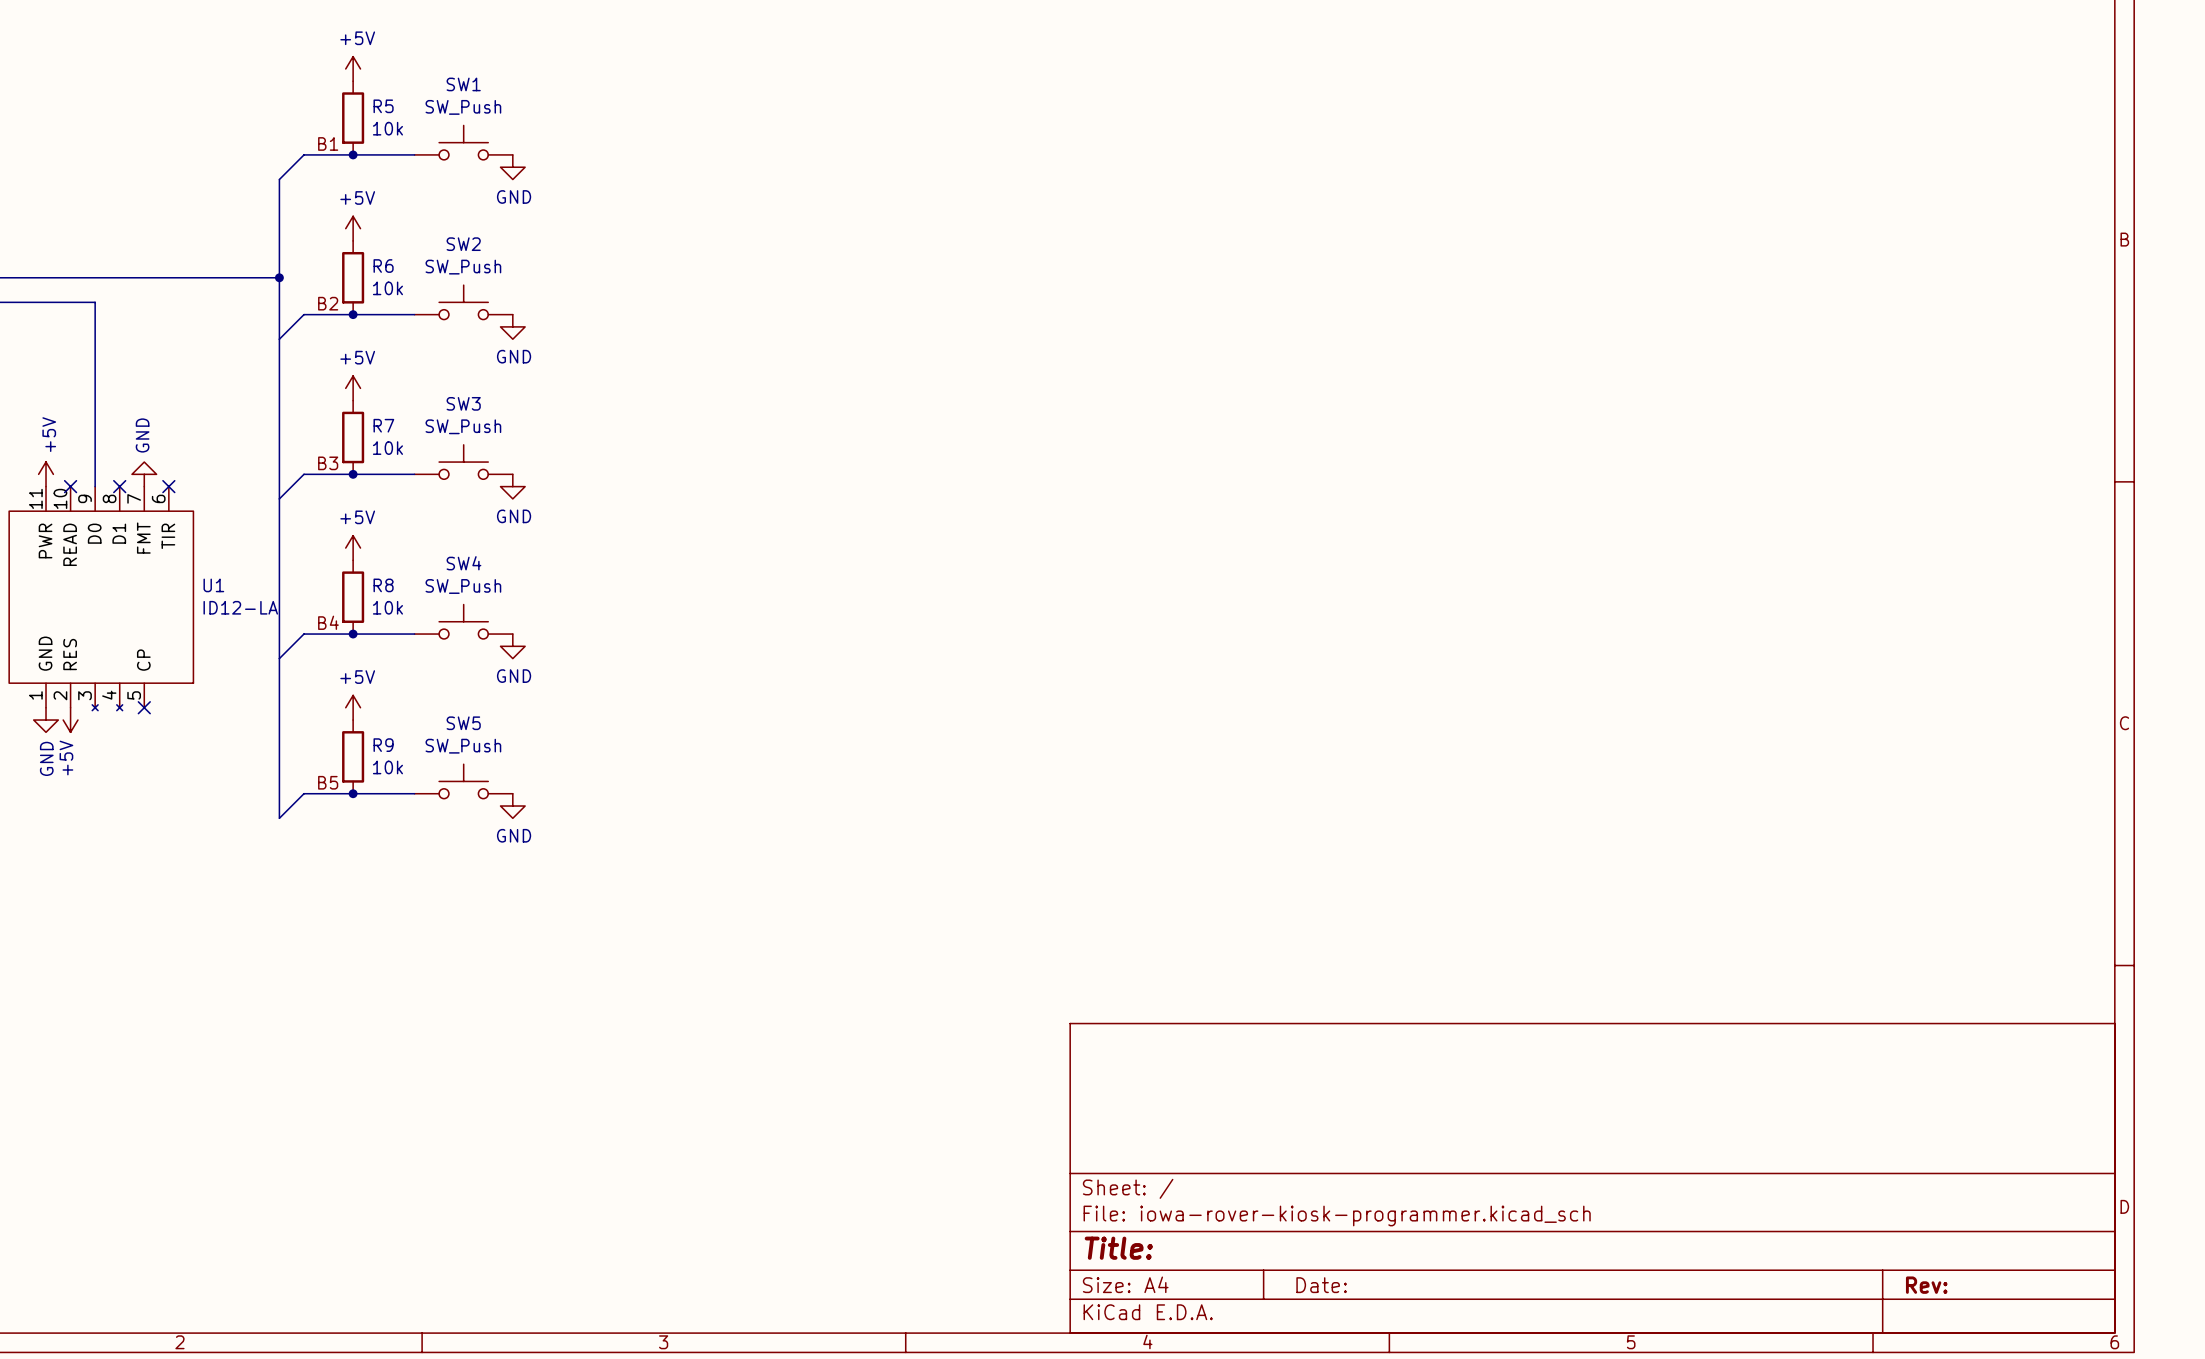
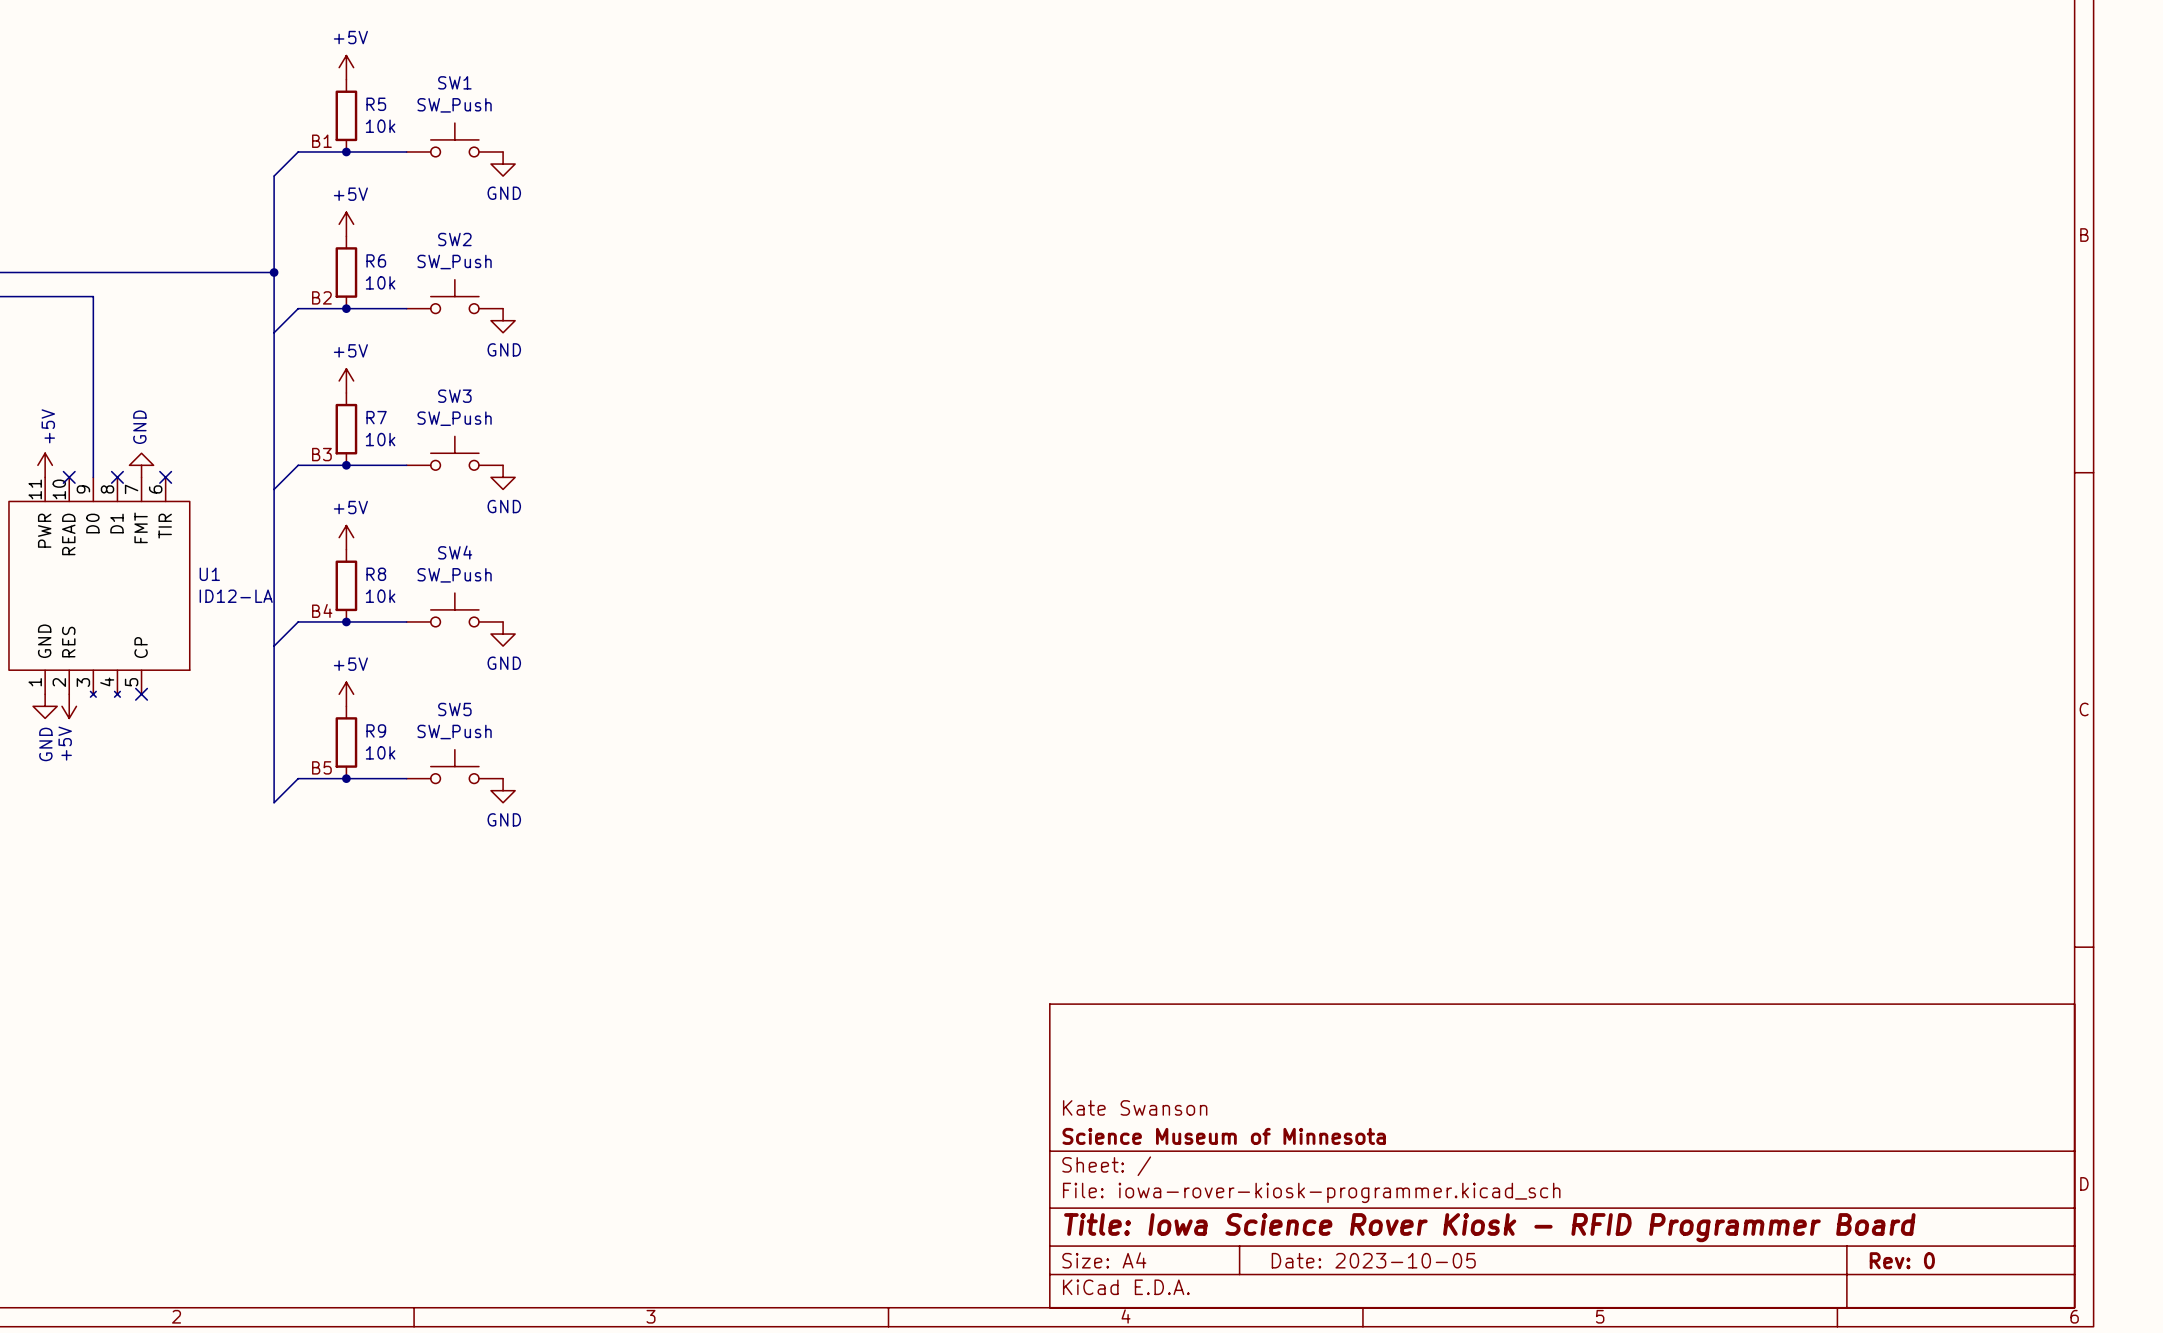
title block: none -> Kate Swanson (1135, 1107)
title block: none -> Science Museum of Minnesota (1224, 1136)
title block: Title: (1118, 1248) -> Title: Iowa Science Rover Kiosk - RFID Programmer Board (1489, 1227)
title block: Date: (1321, 1285) -> Date: 2023-10-05 (1373, 1260)
title block: Rev: (1926, 1285) -> Rev: 0 (1902, 1260)

